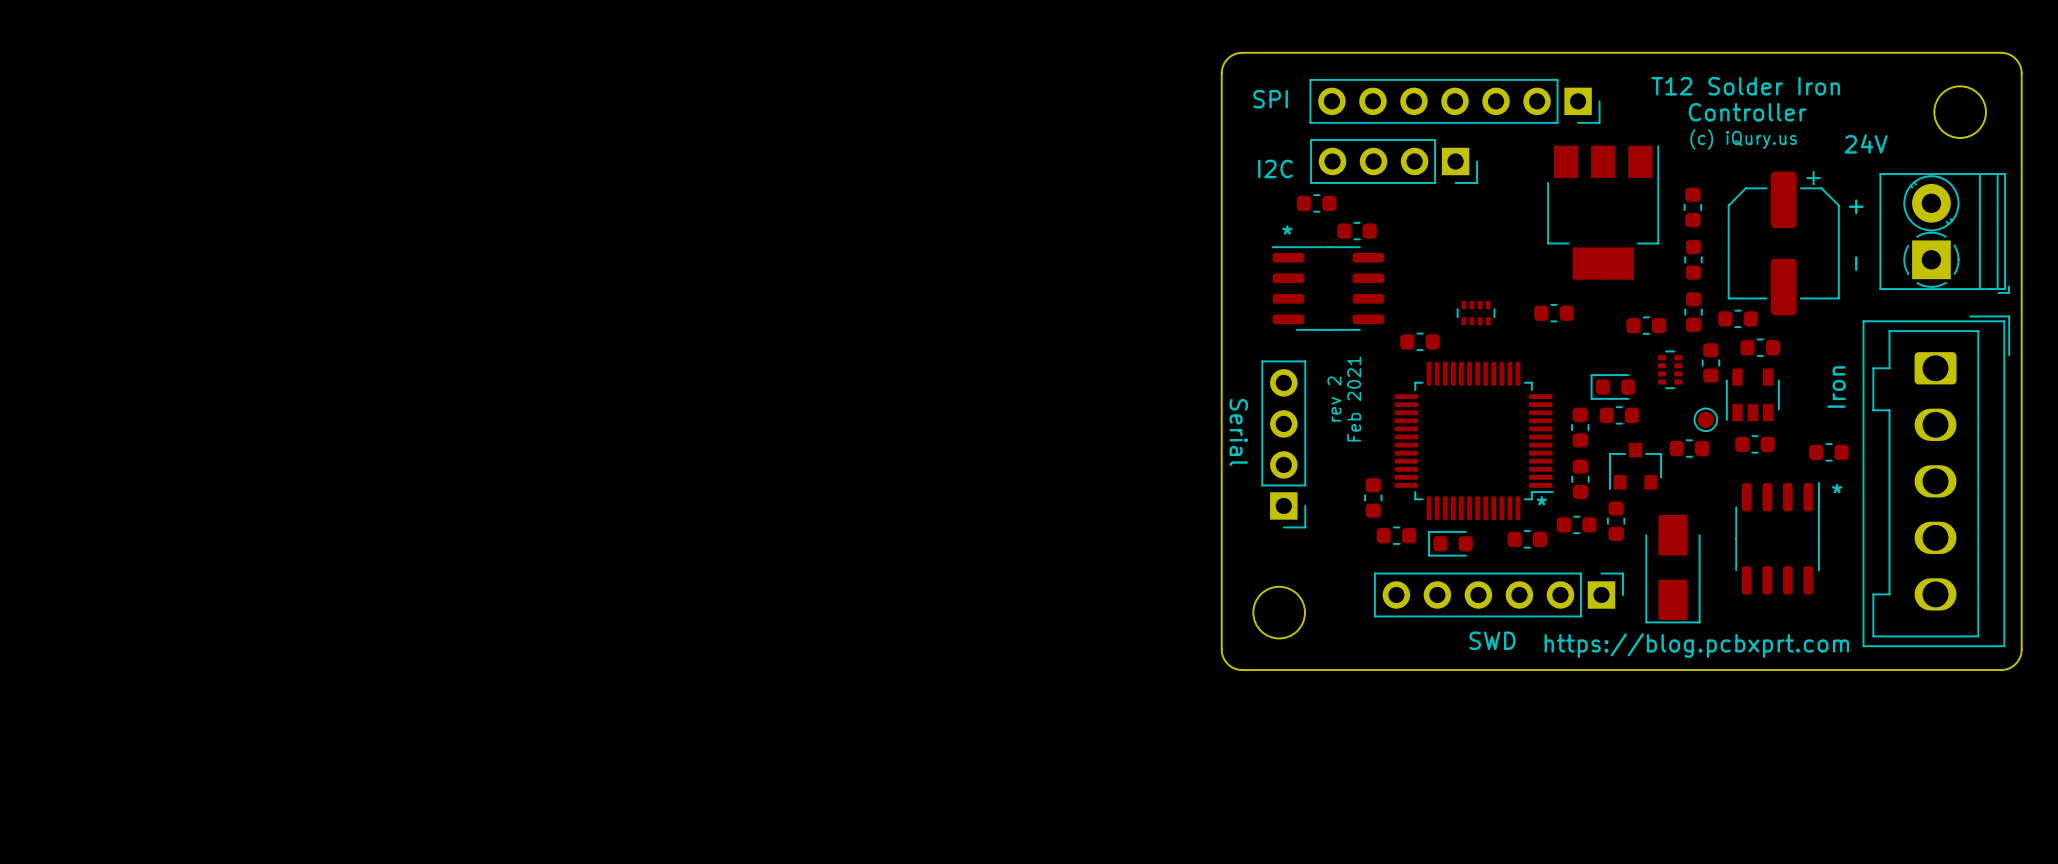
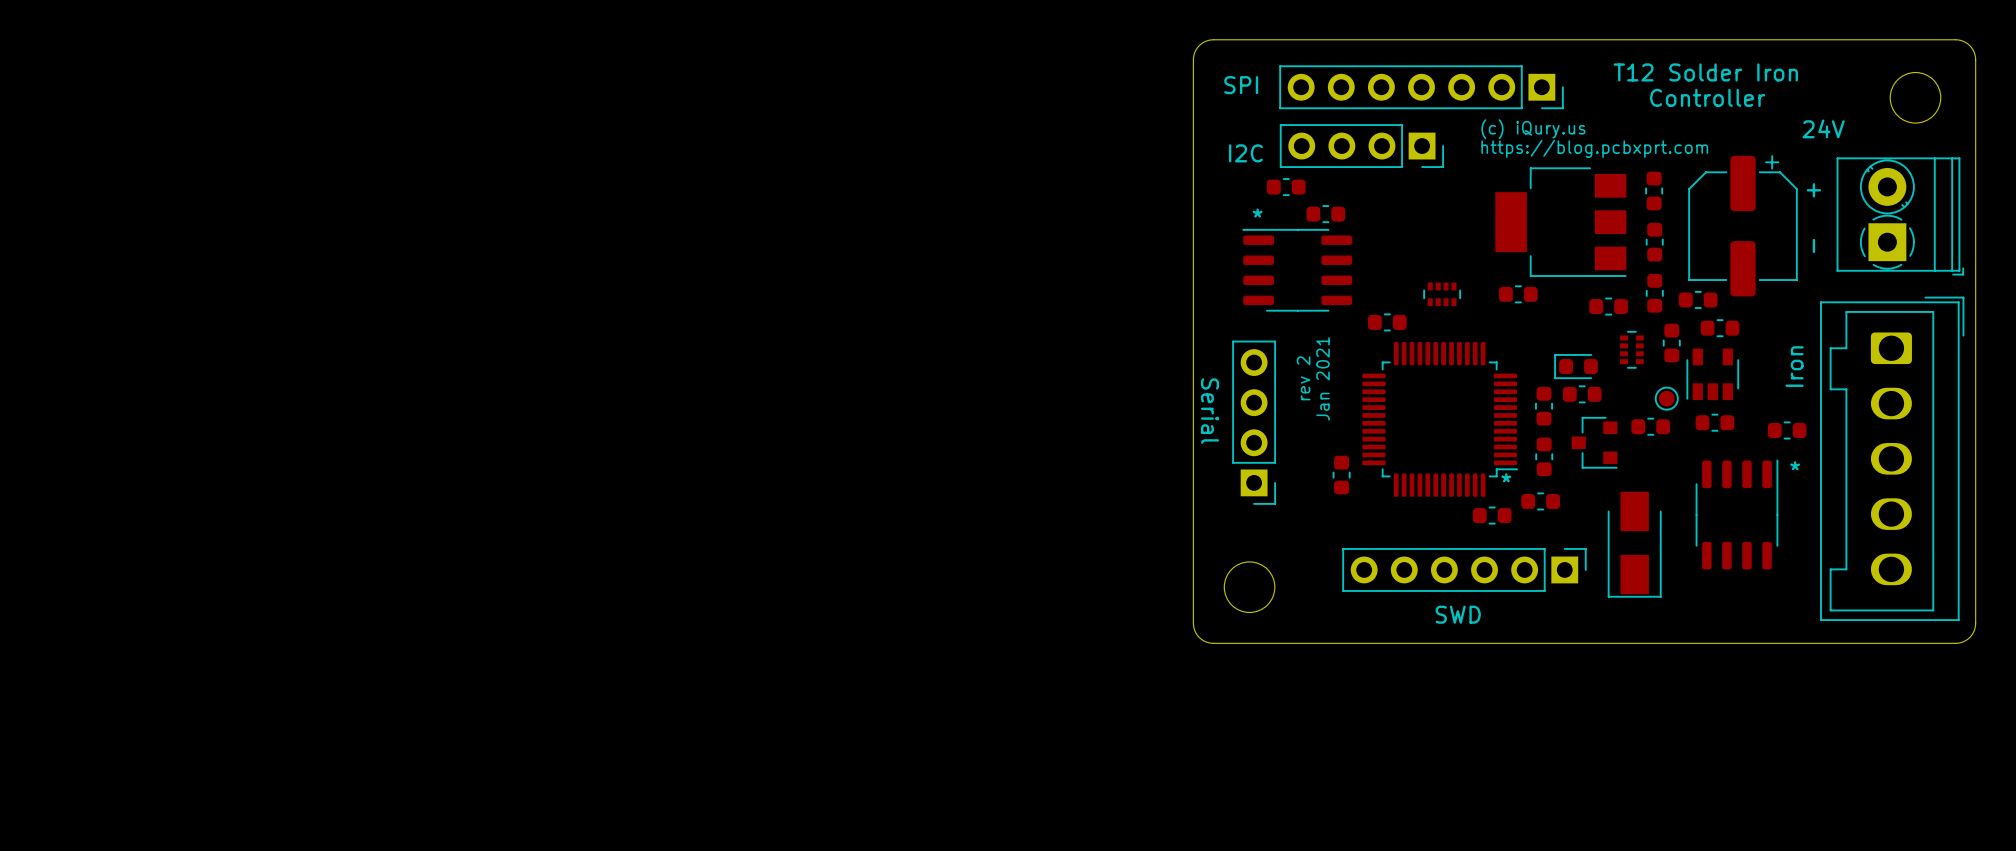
text position: (c) iQury.us (1743, 139) -> (c) iQury.us (1533, 129)
text: none -> https://blog.pcbxprt.com (1594, 148)
part rotation: 0° (1603, 212) -> 90° clockwise (1560, 222)
text: Feb 2021 (1354, 399) -> Jan 2021 (1322, 378)
part rotation: 0° (1635, 466) -> 90° counterclockwise (1594, 442)
part: (1616, 521) -> none
part: (1396, 535) -> none
part: (1450, 543) -> none
text: https://blog.pcbxprt.com (1696, 645) -> none

